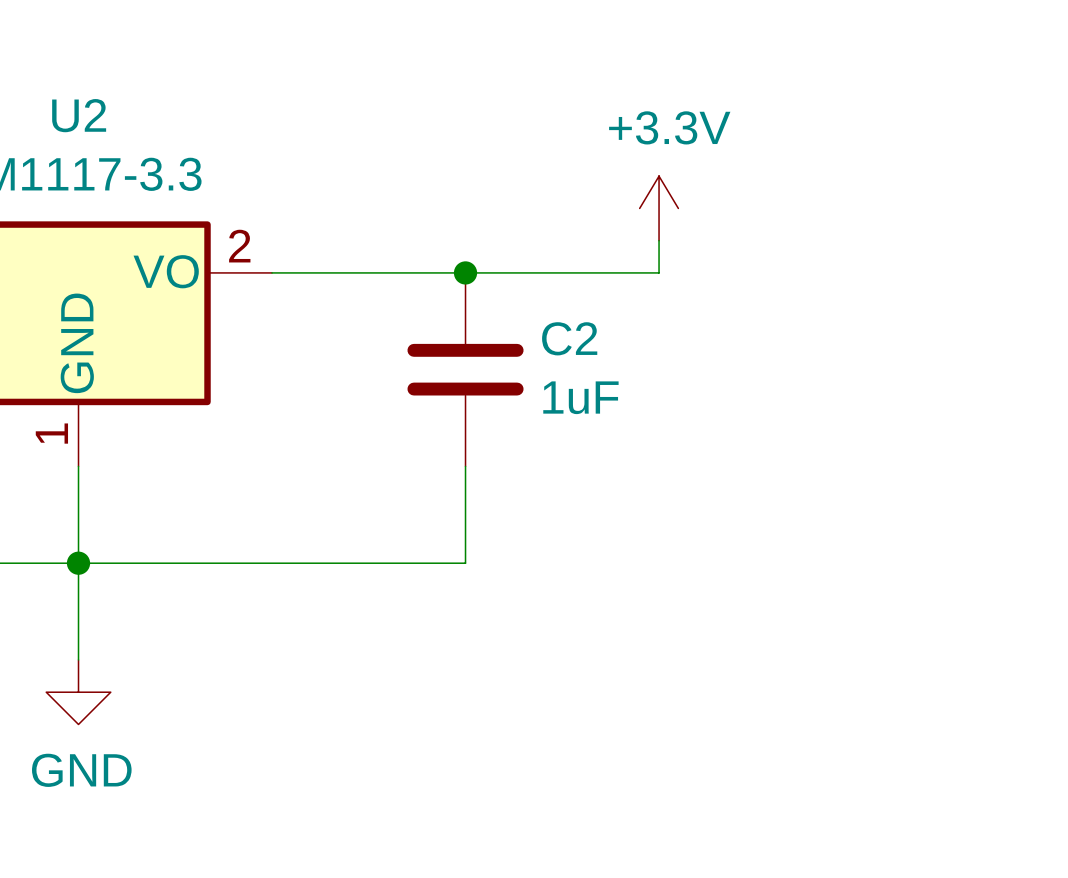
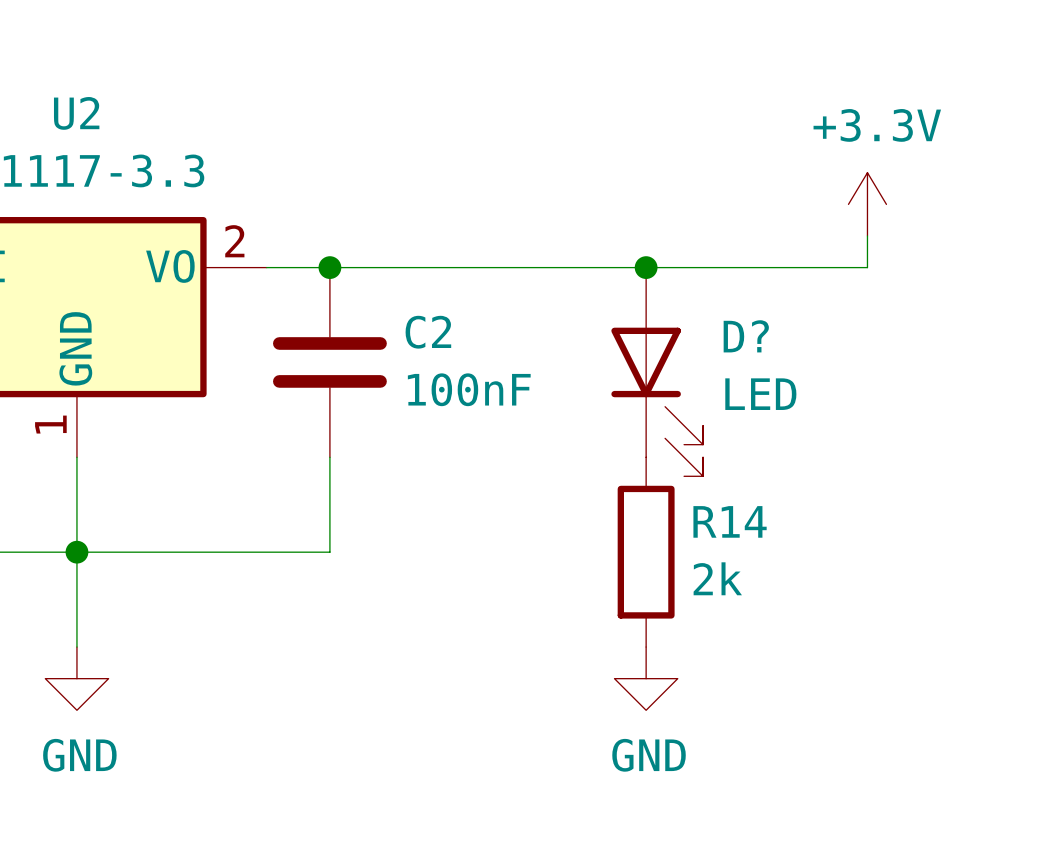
power symbol position: +3.3V (659, 208) -> +3.3V (867, 204)
wire: (659, 240) (659, 272) -> (867, 235) (867, 267) (646, 267)
junction: none -> (329, 267)
junction: (465, 272) -> none
junction: none -> (646, 267)
C2 position: (465, 369) -> (329, 362)
D?: none -> LED (657, 371)
C2 value: 1uF (580, 397) -> 100nF (469, 389)
wire: (465, 466) (465, 563) (336, 563) -> (329, 457) (329, 552)
R14: none -> 2k (646, 552)
power symbol: none -> GND (646, 678)

